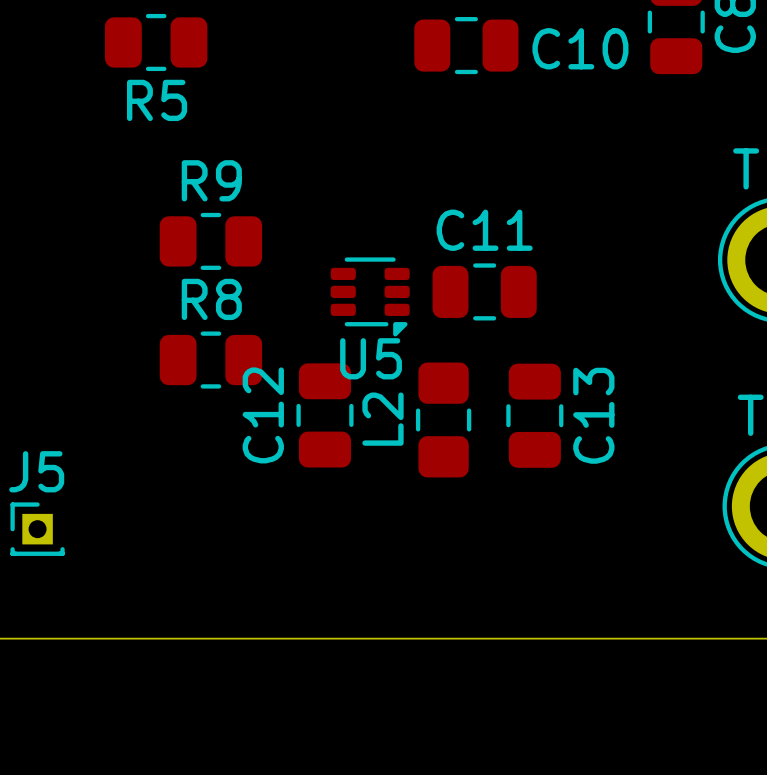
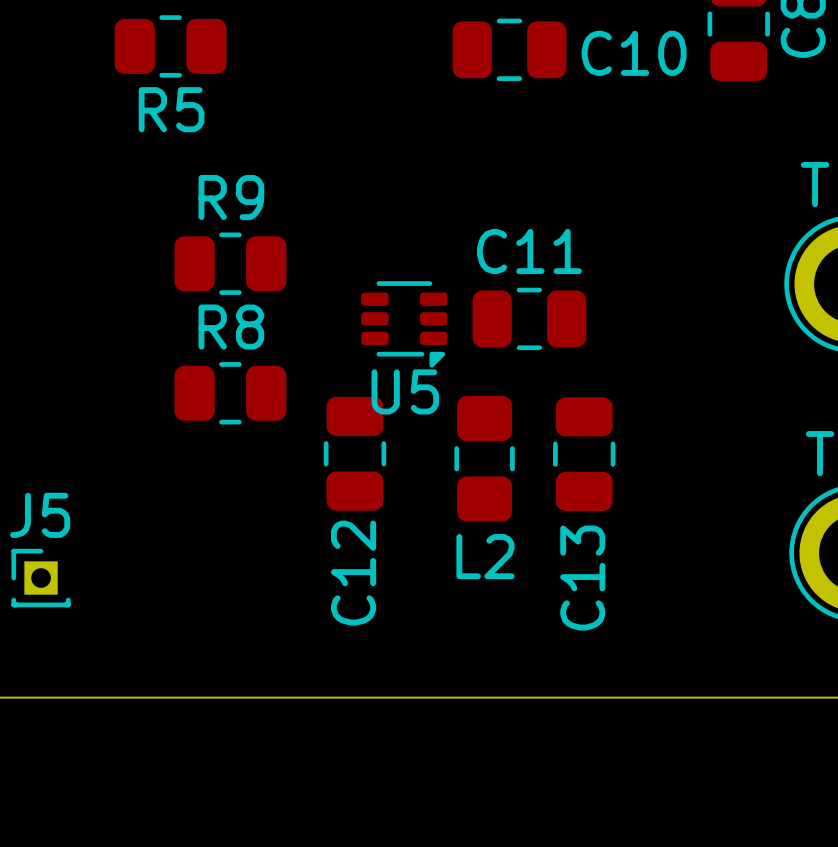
C12 name position: C12 (263, 415) -> C12 (353, 573)
C13 name position: C13 (593, 415) -> C13 (582, 578)
L2 name rotation: 0° (382, 419) -> 90° clockwise (485, 556)
L2 name position: L2 (382, 419) -> L2 (485, 556)

